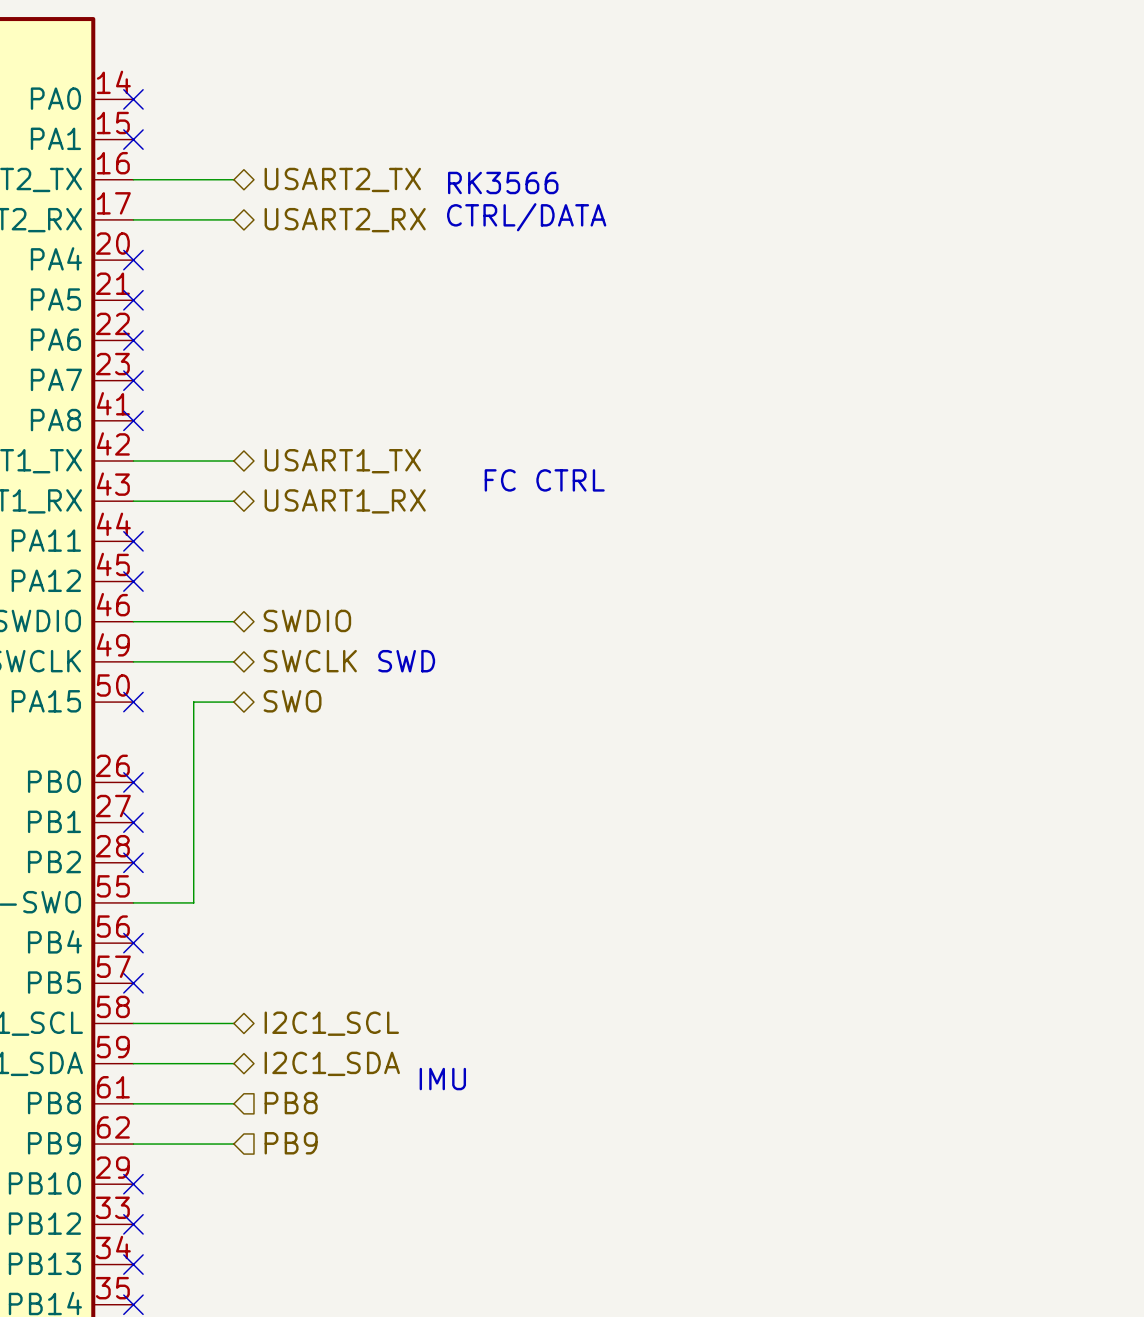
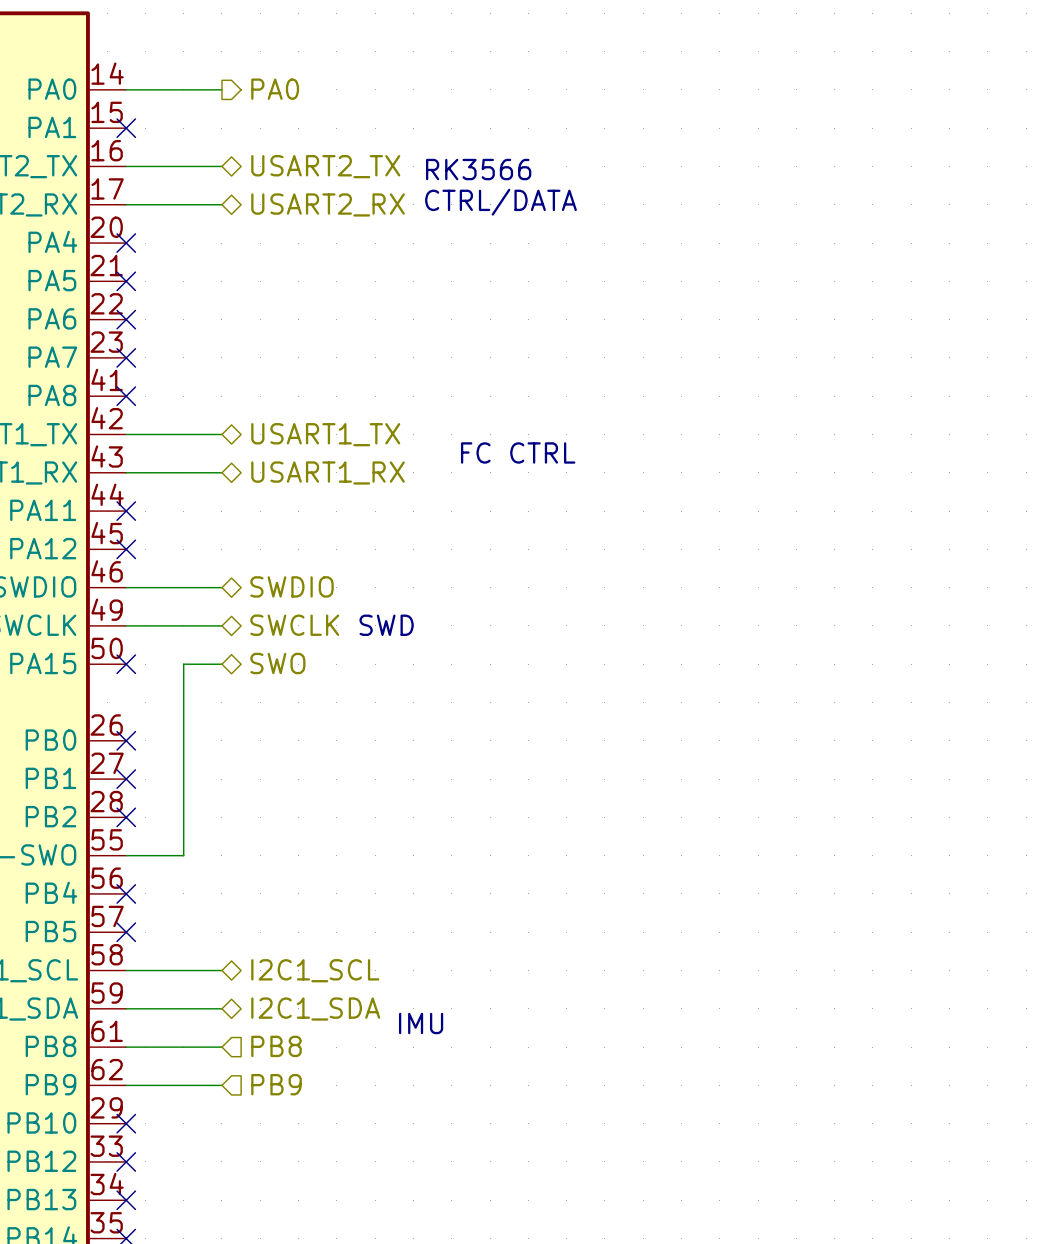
hierarchical label: none -> PA0 (275, 89)
wire: none -> (126, 89) (221, 89)
no-connect mark: (133, 99) -> none

